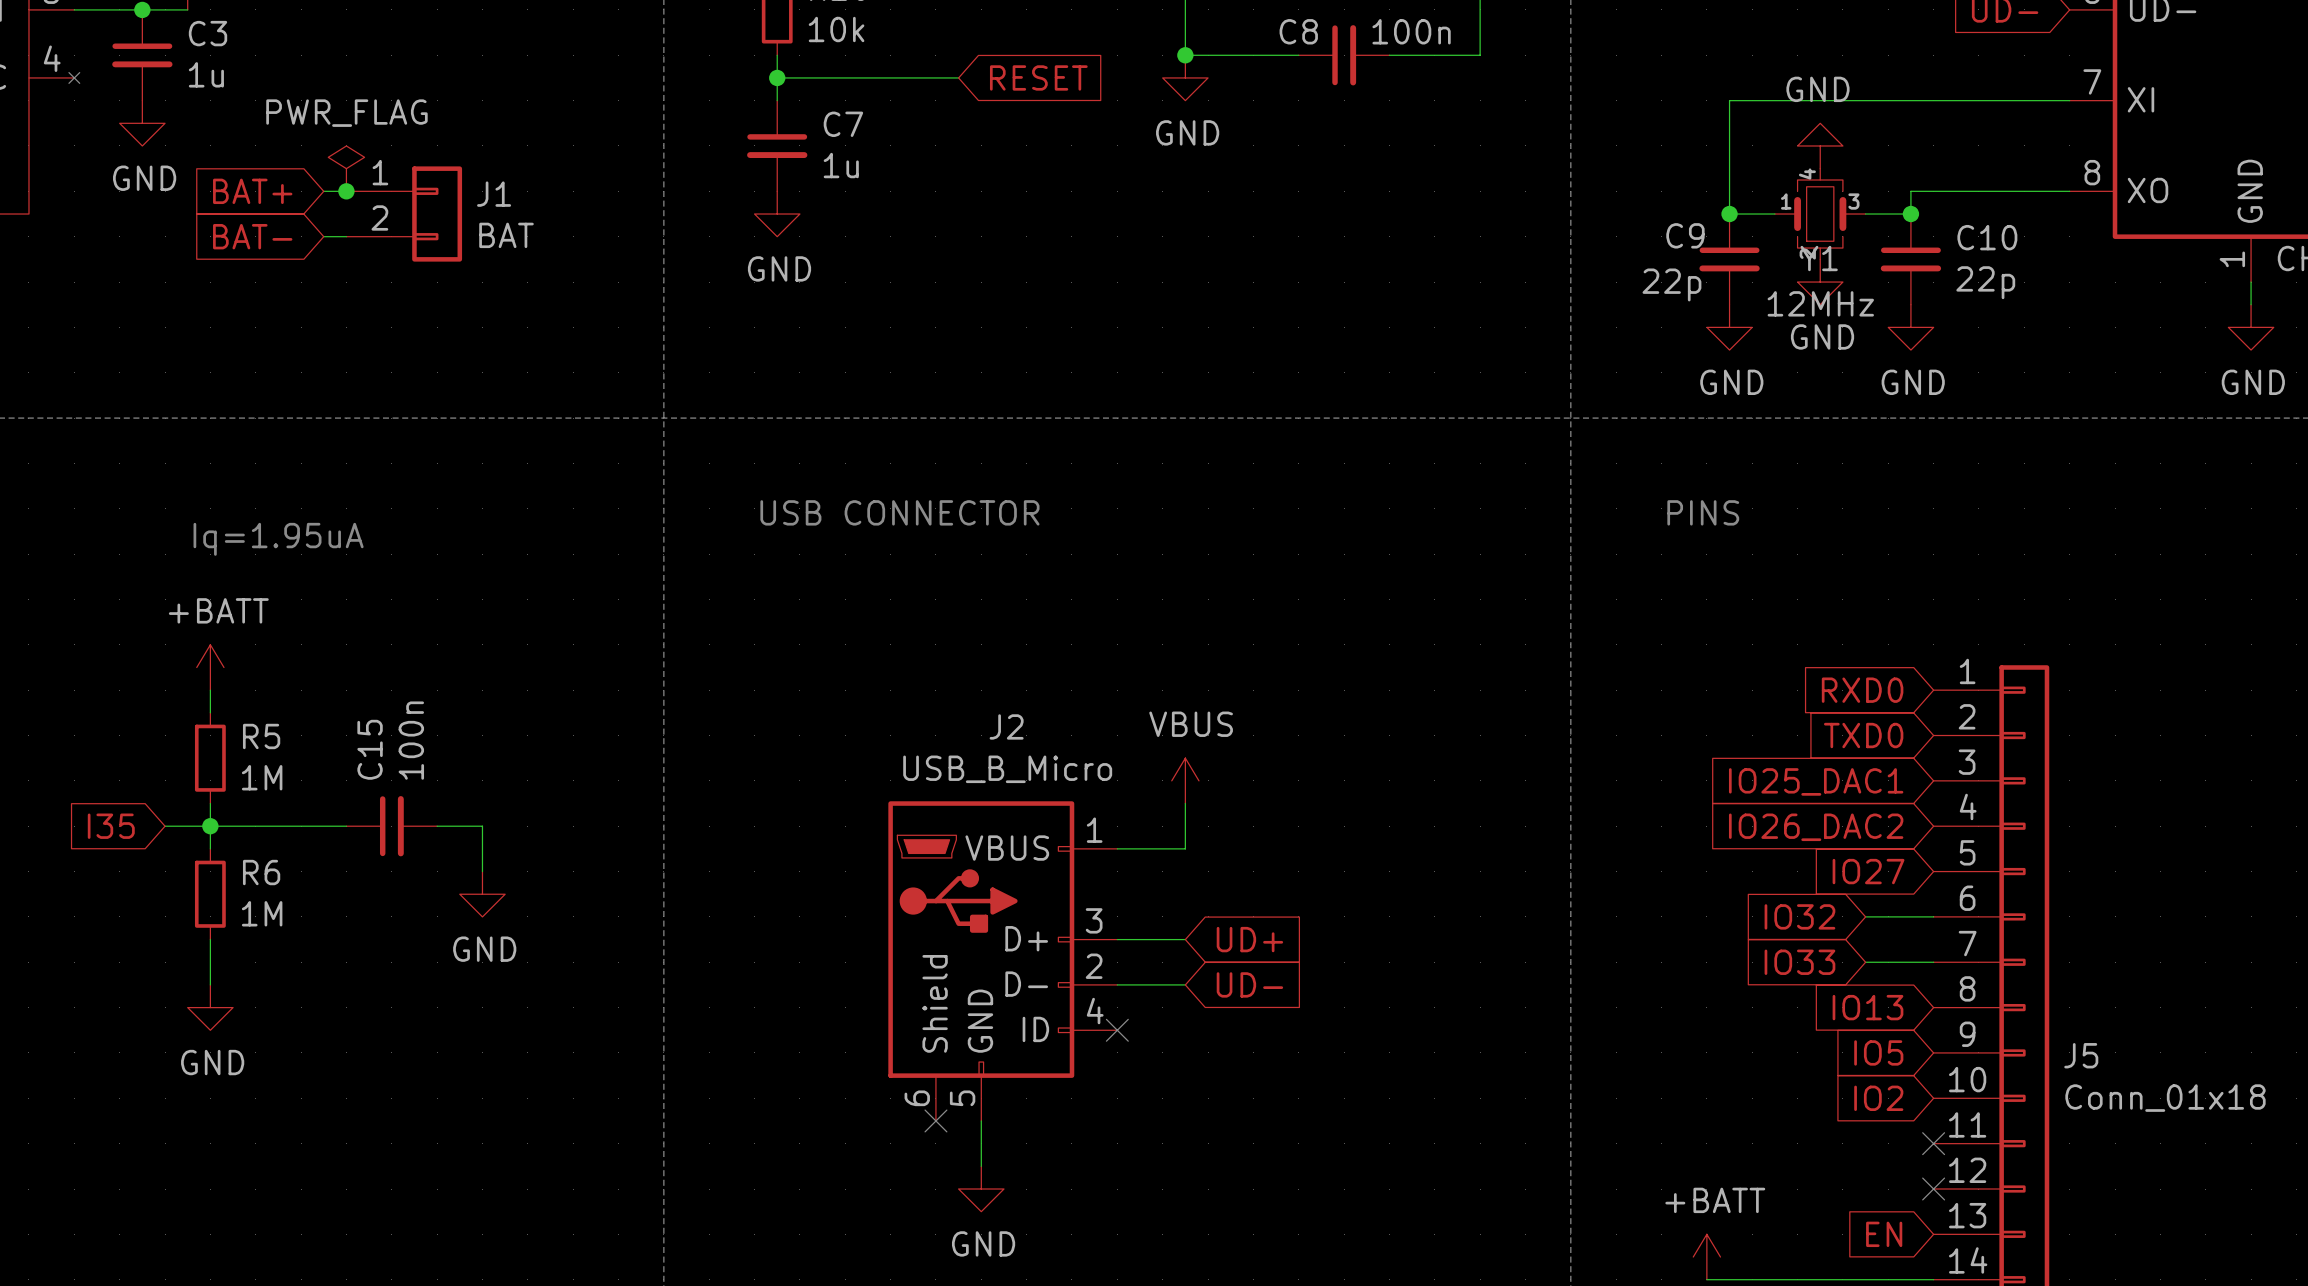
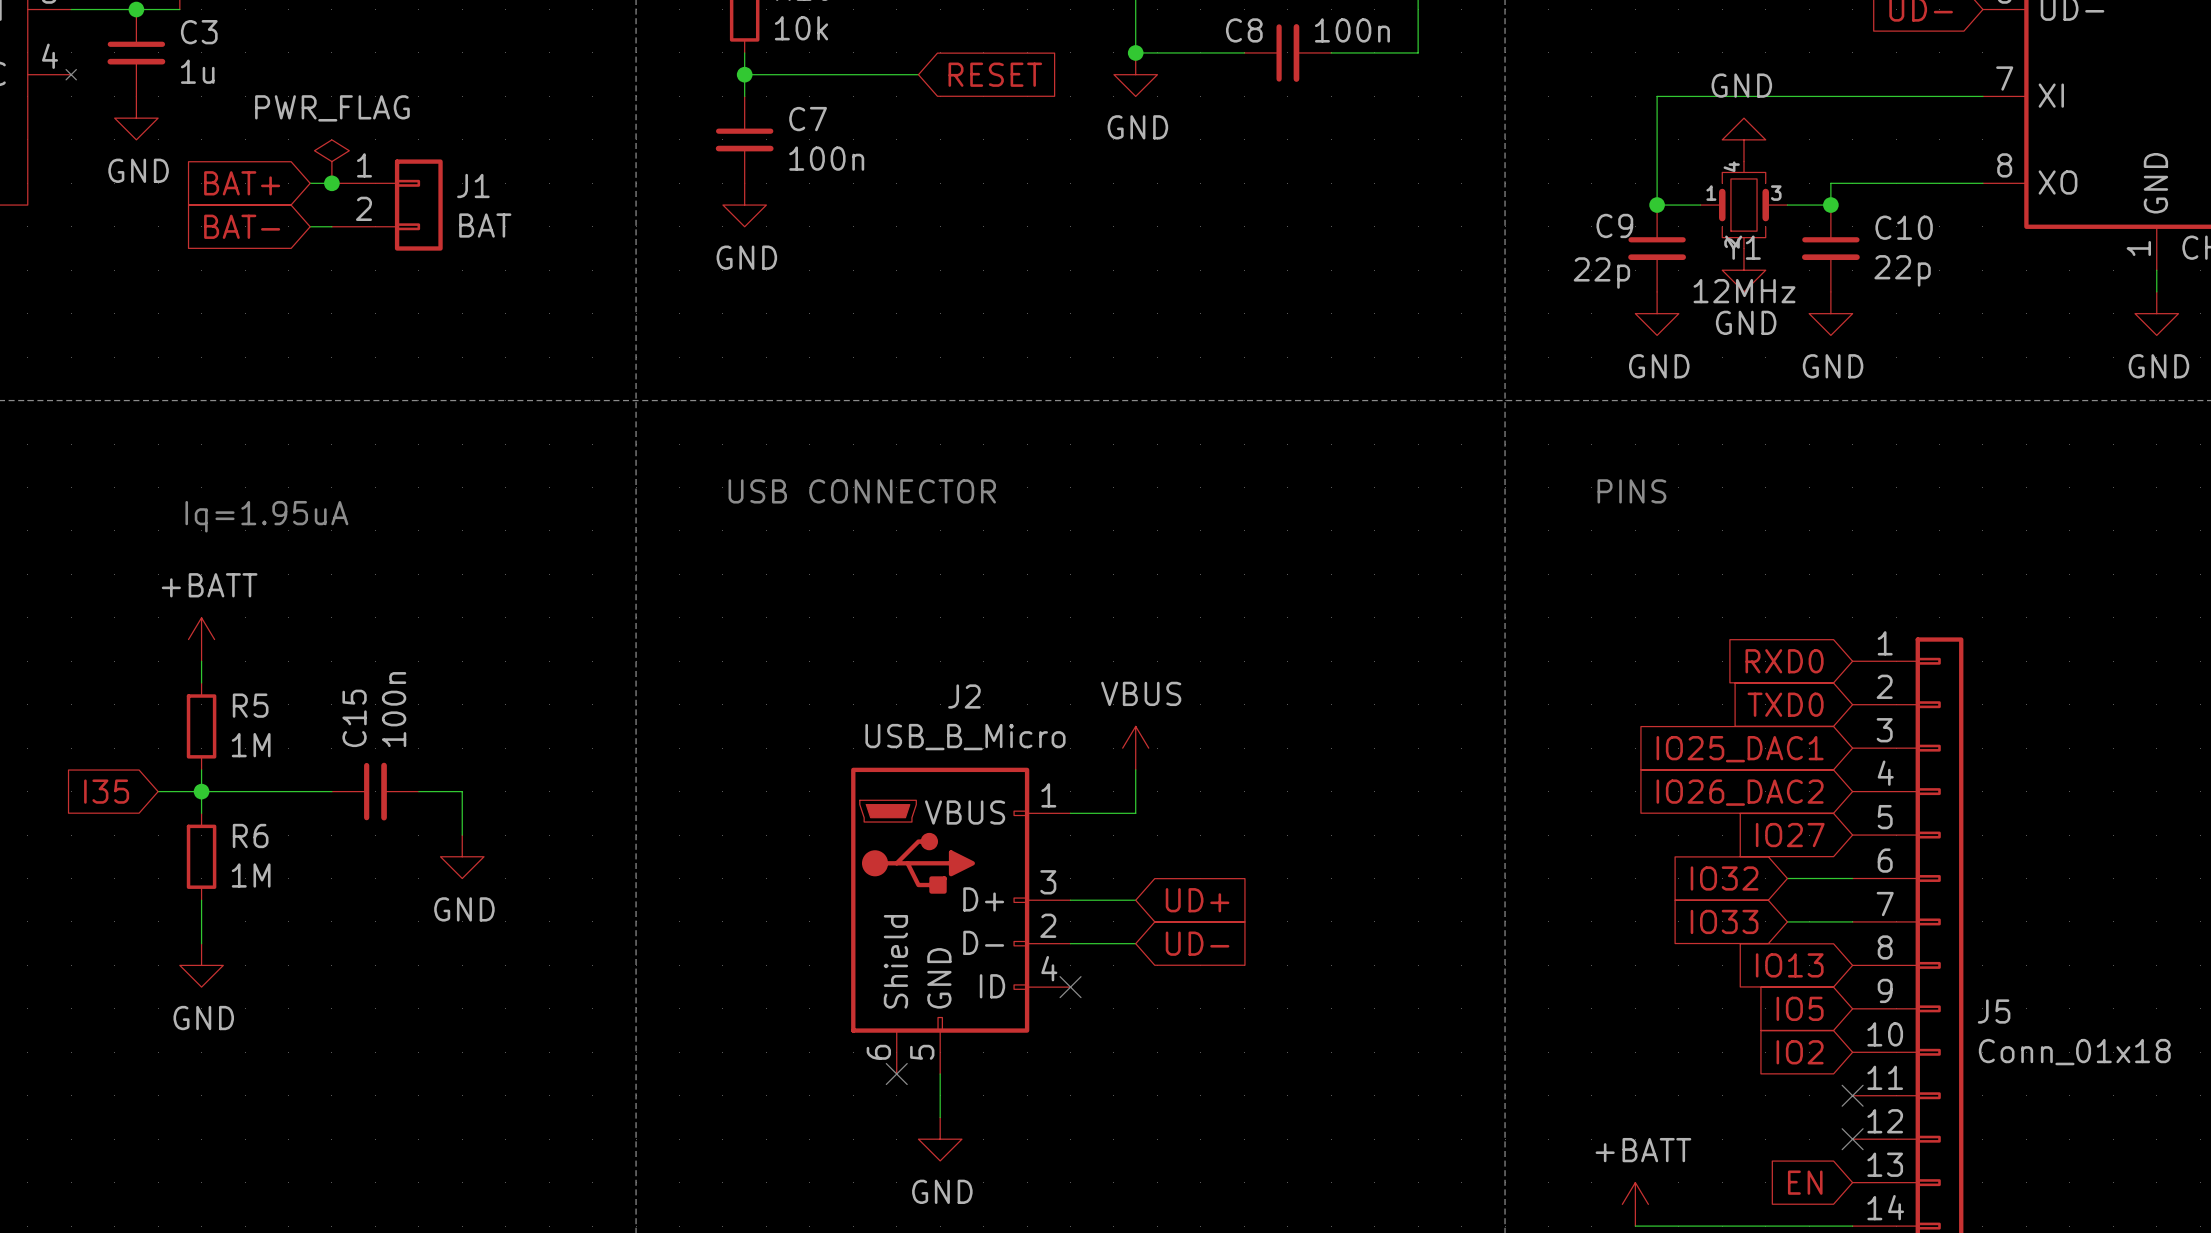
C7 value: 1u (841, 165) -> 100n (826, 158)

